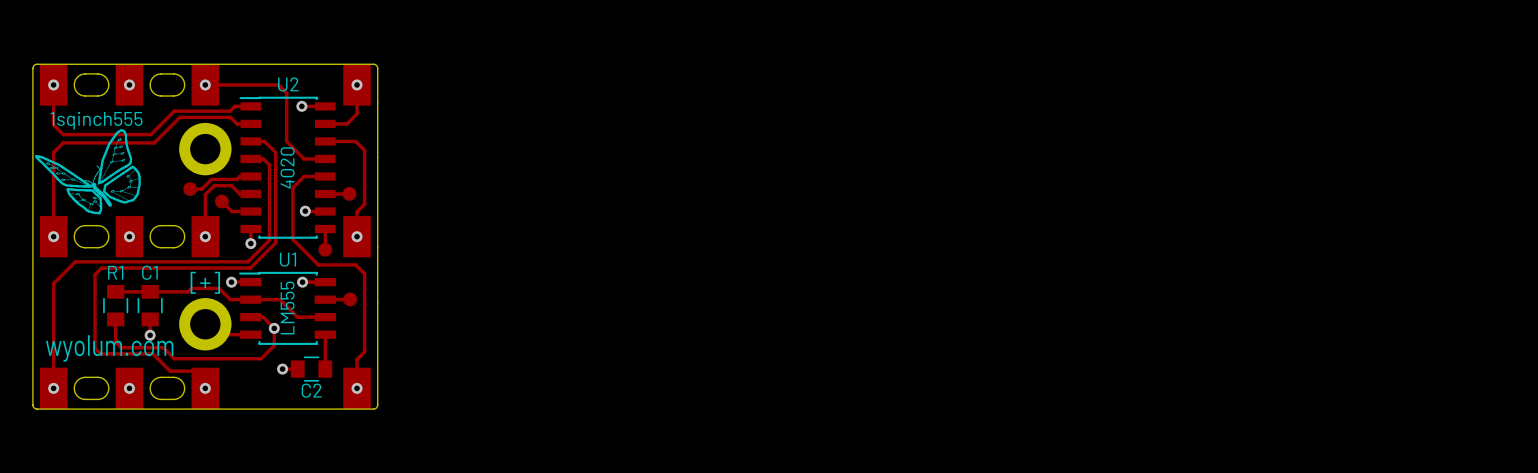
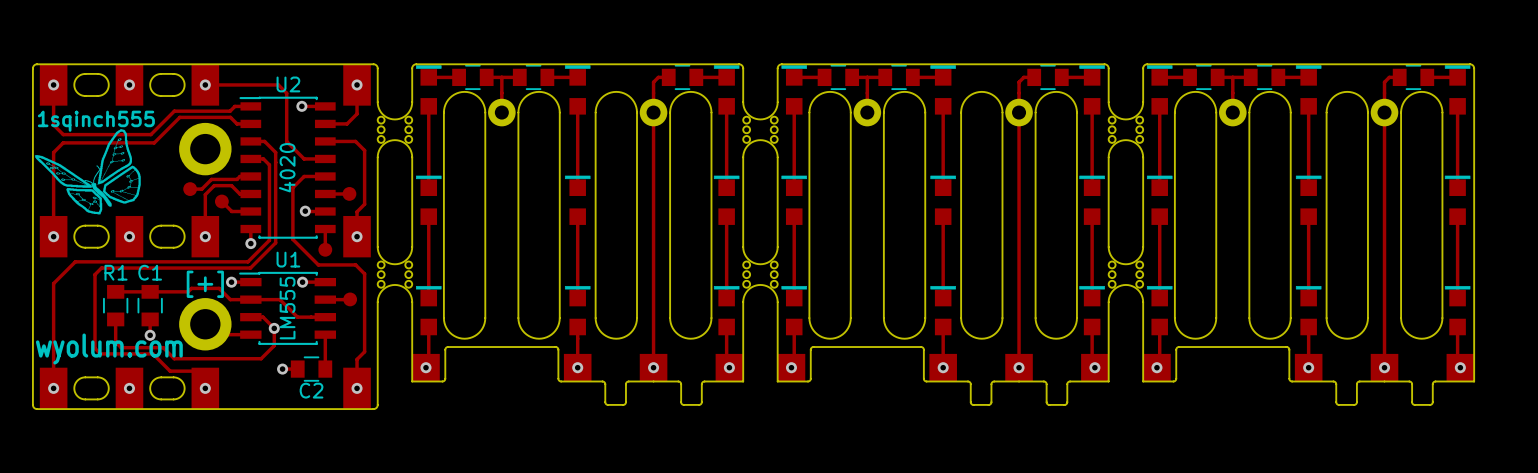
track: none -> (428, 77) (459, 77)
part: none -> (472, 77)
track: none -> (486, 77) (519, 77)
track: none -> (501, 77) (501, 112)
part: none -> (533, 77)
track: none -> (547, 77) (577, 77)
track: none -> (668, 77) (658, 77) (653, 82) (653, 367)
part: none -> (682, 77)
track: none -> (696, 77) (726, 77)
track: none -> (794, 77) (824, 77)
part: none -> (838, 77)
track: none -> (852, 77) (885, 77)
track: none -> (867, 77) (867, 112)
part: none -> (899, 77)
track: none -> (912, 77) (943, 77)
track: none -> (1034, 77) (1023, 77) (1019, 82) (1019, 367)
part: none -> (1048, 77)
track: none -> (1061, 77) (1092, 77)
track: none -> (1159, 77) (1190, 77)
part: none -> (1203, 77)
track: none -> (1217, 77) (1250, 77)
track: none -> (1232, 77) (1232, 112)
part: none -> (1264, 77)
track: none -> (1278, 77) (1308, 77)
track: none -> (1399, 77) (1389, 77) (1384, 82) (1384, 367)
part: none -> (1413, 77)
track: none -> (1427, 77) (1457, 77)
part: none -> (428, 89)
part: none -> (577, 89)
part: none -> (726, 89)
part: none -> (794, 89)
part: none -> (943, 89)
part: none -> (1092, 89)
part: none -> (1159, 89)
part: none -> (1308, 89)
part: none -> (1457, 89)
board edge: (377, 102) (377, 157) -> (377, 102) (381, 112) (388, 118) (397, 119) (407, 114) (412, 104) (412, 67) (415, 64) (739, 64) (743, 67) (744, 108) (749, 115) (760, 119) (770, 115) (776, 108) (777, 67) (781, 64) (1104, 64) (1108, 67) (1109, 108) (1115, 115) (1125, 119) (1136, 115) (1141, 108) (1143, 67) (1146, 64) (1471, 64) (1474, 68) (1474, 381) (1434, 381) (1432, 402) (1430, 404) (1412, 403) (1412, 383) (1410, 381) (1359, 381) (1356, 383) (1356, 404) (1338, 404) (1336, 402) (1334, 381) (1290, 380) (1289, 349) (1287, 347) (1179, 347) (1176, 349) (1175, 380) (1143, 381) (1143, 299) (1138, 290) (1125, 284) (1115, 288) (1108, 299) (1108, 381) (1068, 381) (1067, 402) (1065, 404) (1047, 404) (1046, 383) (1043, 381) (993, 381) (991, 383) (990, 404) (972, 404) (969, 381) (924, 380) (923, 349) (921, 347) (812, 347) (810, 349) (809, 380) (777, 381) (777, 299) (772, 290) (760, 284) (749, 288) (743, 299) (743, 381) (703, 381) (701, 402) (699, 404) (681, 403) (681, 383) (679, 381) (628, 381) (625, 383) (625, 404) (607, 404) (605, 402) (603, 381) (559, 380) (558, 349) (555, 347) (447, 347) (445, 349) (444, 380) (412, 381) (410, 295) (403, 287) (392, 285) (381, 291) (377, 302)
track: none -> (428, 106) (428, 187)
track: none -> (577, 106) (577, 187)
track: none -> (726, 106) (726, 187)
track: none -> (794, 106) (794, 187)
track: none -> (943, 106) (943, 187)
track: none -> (1092, 106) (1092, 187)
track: none -> (1159, 106) (1159, 187)
track: none -> (1308, 106) (1308, 187)
track: none -> (1457, 106) (1457, 187)
board edge: none -> (443, 112) (443, 318) (444, 320) (446, 328) (452, 334) (459, 338) (467, 338) (479, 332) (485, 320) (485, 109) (482, 102) (477, 96) (469, 92) (461, 92) (454, 94) (448, 99) (445, 104) (444, 109) (443, 112)
part: none -> (501, 112)
board edge: none -> (518, 112) (518, 320) (521, 328) (526, 334) (533, 338) (541, 338) (553, 332) (559, 320) (559, 109) (557, 102) (551, 96) (544, 92) (536, 92) (528, 94) (522, 99) (518, 112)
board edge: none -> (595, 112) (595, 320) (598, 328) (603, 334) (610, 338) (619, 338) (630, 332) (636, 320) (636, 109) (634, 102) (628, 96) (621, 92) (613, 92) (605, 94) (599, 99) (595, 112)
part: none -> (653, 112)
board edge: none -> (670, 112) (670, 318) (670, 320) (672, 328) (678, 334) (685, 338) (693, 338) (705, 332) (711, 320) (711, 109) (708, 102) (703, 96) (690, 91) (682, 93) (676, 97) (671, 104) (670, 109) (670, 112)
board edge: none -> (809, 112) (809, 318) (809, 320) (812, 328) (817, 334) (824, 338) (832, 338) (844, 332) (850, 320) (850, 109) (848, 102) (842, 96) (835, 92) (827, 92) (819, 94) (813, 99) (810, 104) (809, 109) (809, 112)
part: none -> (867, 112)
board edge: none -> (883, 112) (884, 320) (886, 328) (891, 334) (899, 338) (907, 338) (919, 332) (925, 320) (925, 109) (922, 102) (917, 96) (909, 92) (901, 92) (894, 94) (888, 99) (883, 112)
board edge: none -> (961, 112) (961, 320) (963, 328) (969, 334) (976, 338) (984, 338) (996, 332) (1002, 320) (1002, 109) (999, 102) (994, 96) (987, 92) (979, 92) (971, 94) (965, 99) (961, 112)
part: none -> (1019, 112)
board edge: none -> (1035, 112) (1035, 318) (1035, 320) (1038, 328) (1043, 334) (1050, 338) (1058, 338) (1070, 332) (1076, 320) (1076, 109) (1074, 102) (1068, 96) (1056, 91) (1048, 93) (1041, 97) (1037, 104) (1035, 109) (1035, 112)
board edge: none -> (1174, 112) (1174, 318) (1175, 320) (1177, 328) (1182, 334) (1190, 338) (1198, 338) (1210, 332) (1216, 320) (1216, 109) (1213, 102) (1208, 96) (1200, 92) (1192, 92) (1185, 94) (1179, 99) (1176, 104) (1175, 109) (1174, 112)
part: none -> (1232, 112)
board edge: none -> (1249, 112) (1249, 320) (1252, 328) (1257, 334) (1264, 338) (1272, 338) (1284, 332) (1290, 320) (1290, 109) (1287, 102) (1282, 96) (1275, 92) (1267, 92) (1255, 97) (1250, 104) (1249, 112)
board edge: none -> (1326, 112) (1326, 320) (1329, 328) (1334, 334) (1341, 338) (1349, 338) (1361, 332) (1367, 320) (1367, 109) (1365, 102) (1359, 96) (1352, 92) (1344, 92) (1332, 97) (1328, 104) (1326, 112)
part: none -> (1384, 112)
board edge: none -> (1401, 112) (1401, 318) (1401, 320) (1403, 328) (1409, 334) (1416, 338) (1424, 338) (1436, 332) (1442, 320) (1442, 109) (1436, 97) (1429, 93) (1421, 91) (1413, 93) (1407, 97) (1402, 104) (1401, 109) (1401, 112)
part: none -> (394, 129)
part: none -> (760, 129)
part: none -> (1125, 129)
board edge: none -> (743, 157) (743, 249) (749, 260) (762, 264) (772, 259) (777, 249) (777, 155) (772, 145) (760, 140) (748, 145) (743, 157)
board edge: none -> (1108, 157) (1108, 249) (1115, 260) (1128, 264) (1138, 259) (1143, 249) (1143, 155) (1138, 145) (1125, 140) (1113, 145) (1108, 157)
part: none -> (428, 200)
part: none -> (577, 200)
part: none -> (726, 200)
part: none -> (794, 200)
part: none -> (943, 200)
part: none -> (1092, 200)
part: none -> (1159, 200)
part: none -> (1308, 200)
part: none -> (1457, 200)
track: none -> (428, 216) (428, 298)
track: none -> (577, 216) (577, 298)
track: none -> (726, 216) (726, 298)
track: none -> (794, 216) (794, 298)
track: none -> (943, 216) (943, 298)
track: none -> (1092, 216) (1092, 298)
track: none -> (1159, 216) (1159, 298)
track: none -> (1308, 216) (1308, 298)
track: none -> (1457, 216) (1457, 298)
board edge: (377, 247) (377, 302) -> (377, 247) (382, 259) (394, 264) (407, 259) (412, 247) (410, 150) (403, 142) (392, 140) (381, 146) (377, 157)
part: none -> (394, 274)
part: none -> (760, 274)
part: none -> (1125, 274)
part: none -> (428, 310)
part: none -> (577, 310)
part: none -> (726, 310)
part: none -> (794, 310)
part: none -> (943, 310)
part: none -> (1092, 310)
part: none -> (1159, 310)
part: none -> (1308, 310)
part: none -> (1457, 310)
track: none -> (428, 327) (428, 364) (425, 367)
track: none -> (577, 327) (577, 367)
track: none -> (726, 327) (726, 364) (729, 367)
track: none -> (794, 327) (794, 364) (791, 367)
track: none -> (943, 327) (943, 367)
track: none -> (1092, 327) (1092, 364) (1094, 367)
track: none -> (1159, 327) (1159, 364) (1156, 367)
track: none -> (1308, 327) (1308, 367)
track: none -> (1457, 327) (1457, 364) (1460, 367)
part: none -> (425, 367)
via: none -> (425, 367)
part: none -> (577, 367)
via: none -> (577, 367)
part: none -> (653, 367)
via: none -> (653, 367)
part: none -> (729, 367)
via: none -> (729, 367)
part: none -> (791, 367)
via: none -> (791, 367)
part: none -> (943, 367)
via: none -> (943, 367)
part: none -> (1019, 367)
via: none -> (1019, 367)
part: none -> (1094, 367)
via: none -> (1094, 367)
part: none -> (1156, 367)
via: none -> (1156, 367)
part: none -> (1308, 367)
via: none -> (1308, 367)
part: none -> (1384, 367)
via: none -> (1384, 367)
part: none -> (1460, 367)
via: none -> (1460, 367)

